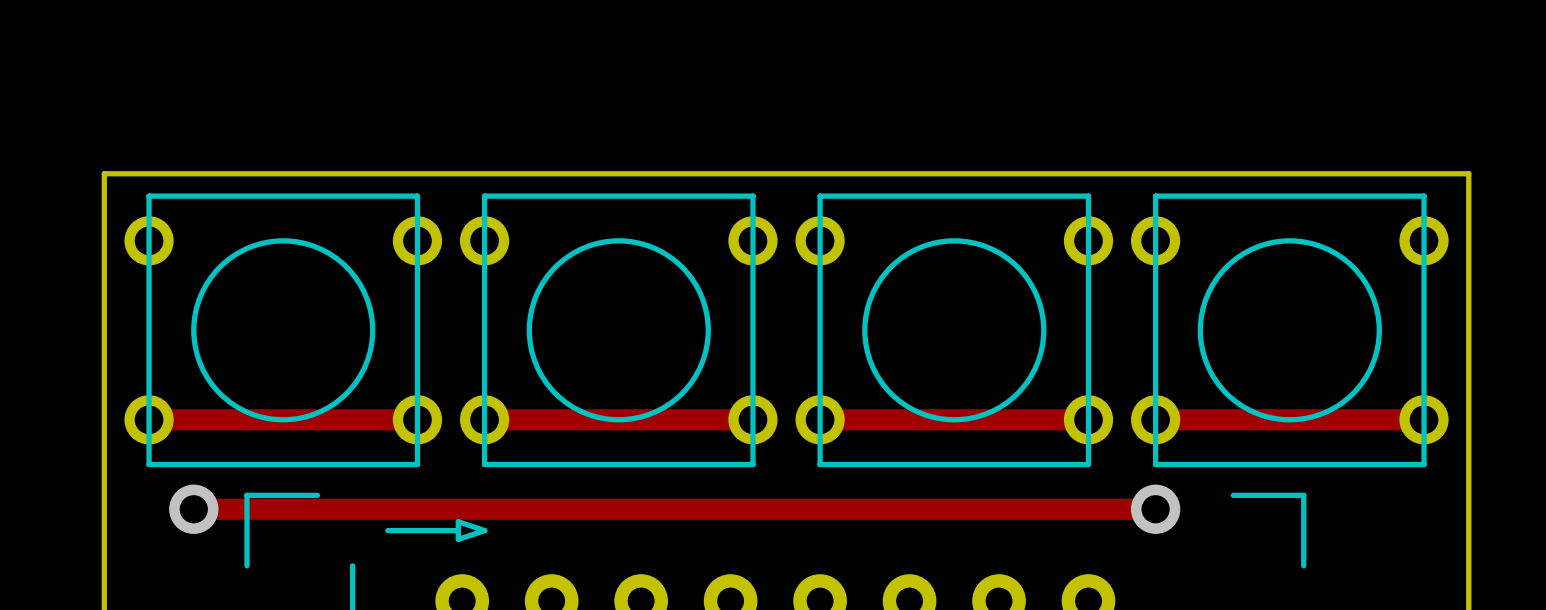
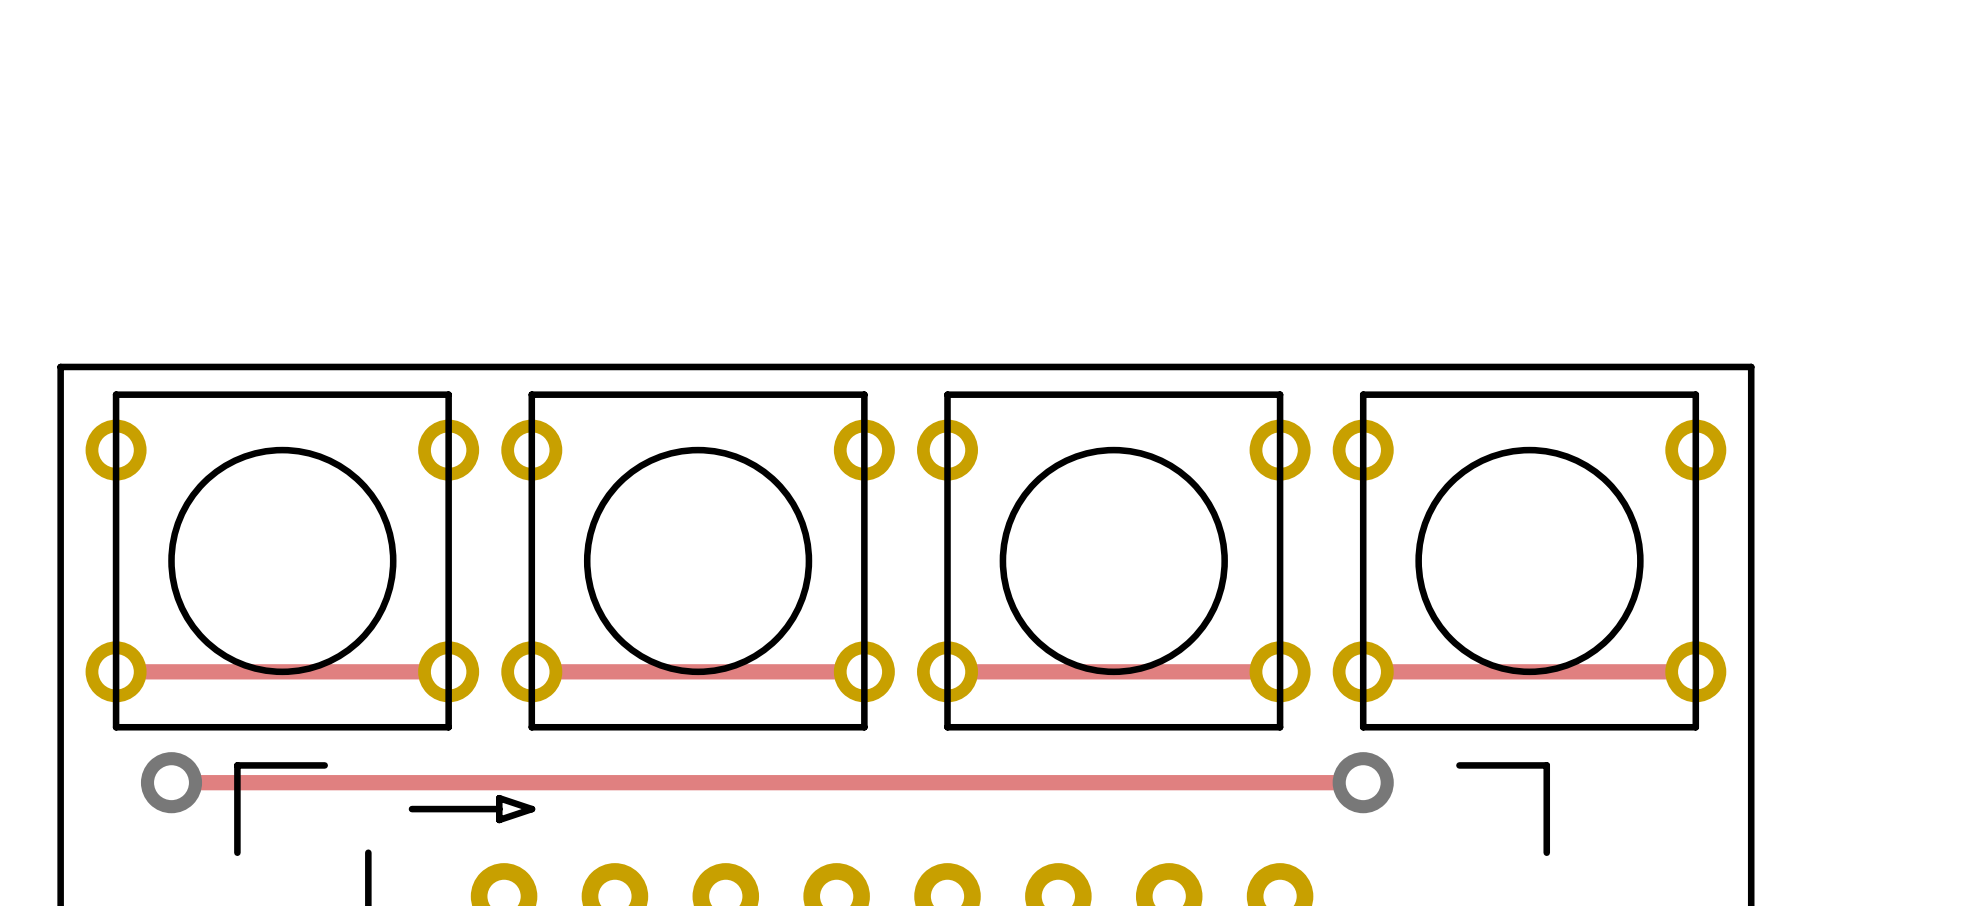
track width: thick (149, 419) (417, 419) -> thin (116, 671) (448, 671)
track width: thick (484, 419) (752, 419) -> thin (531, 671) (864, 671)
track width: thick (820, 419) (1088, 419) -> thin (947, 671) (1280, 671)
track width: thick (1155, 419) (1424, 419) -> thin (1363, 671) (1695, 671)
track width: thick (193, 509) (1155, 509) -> thin (171, 782) (1363, 782)

